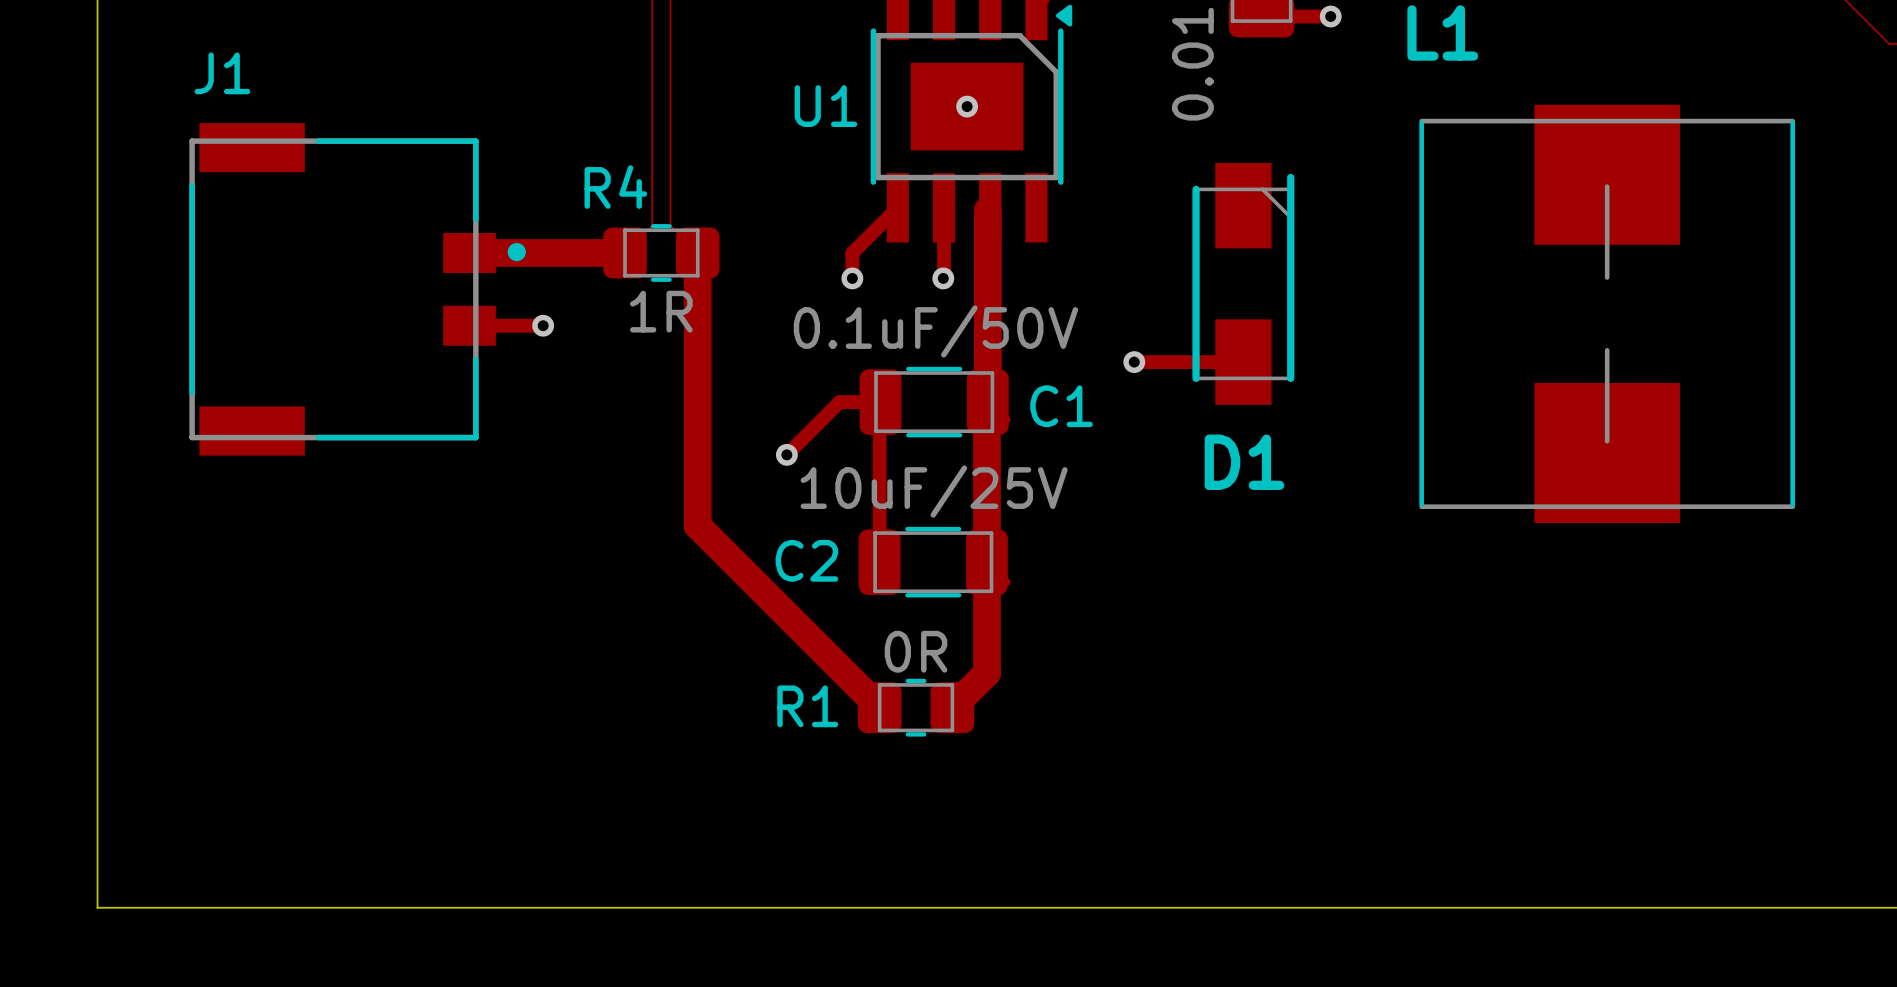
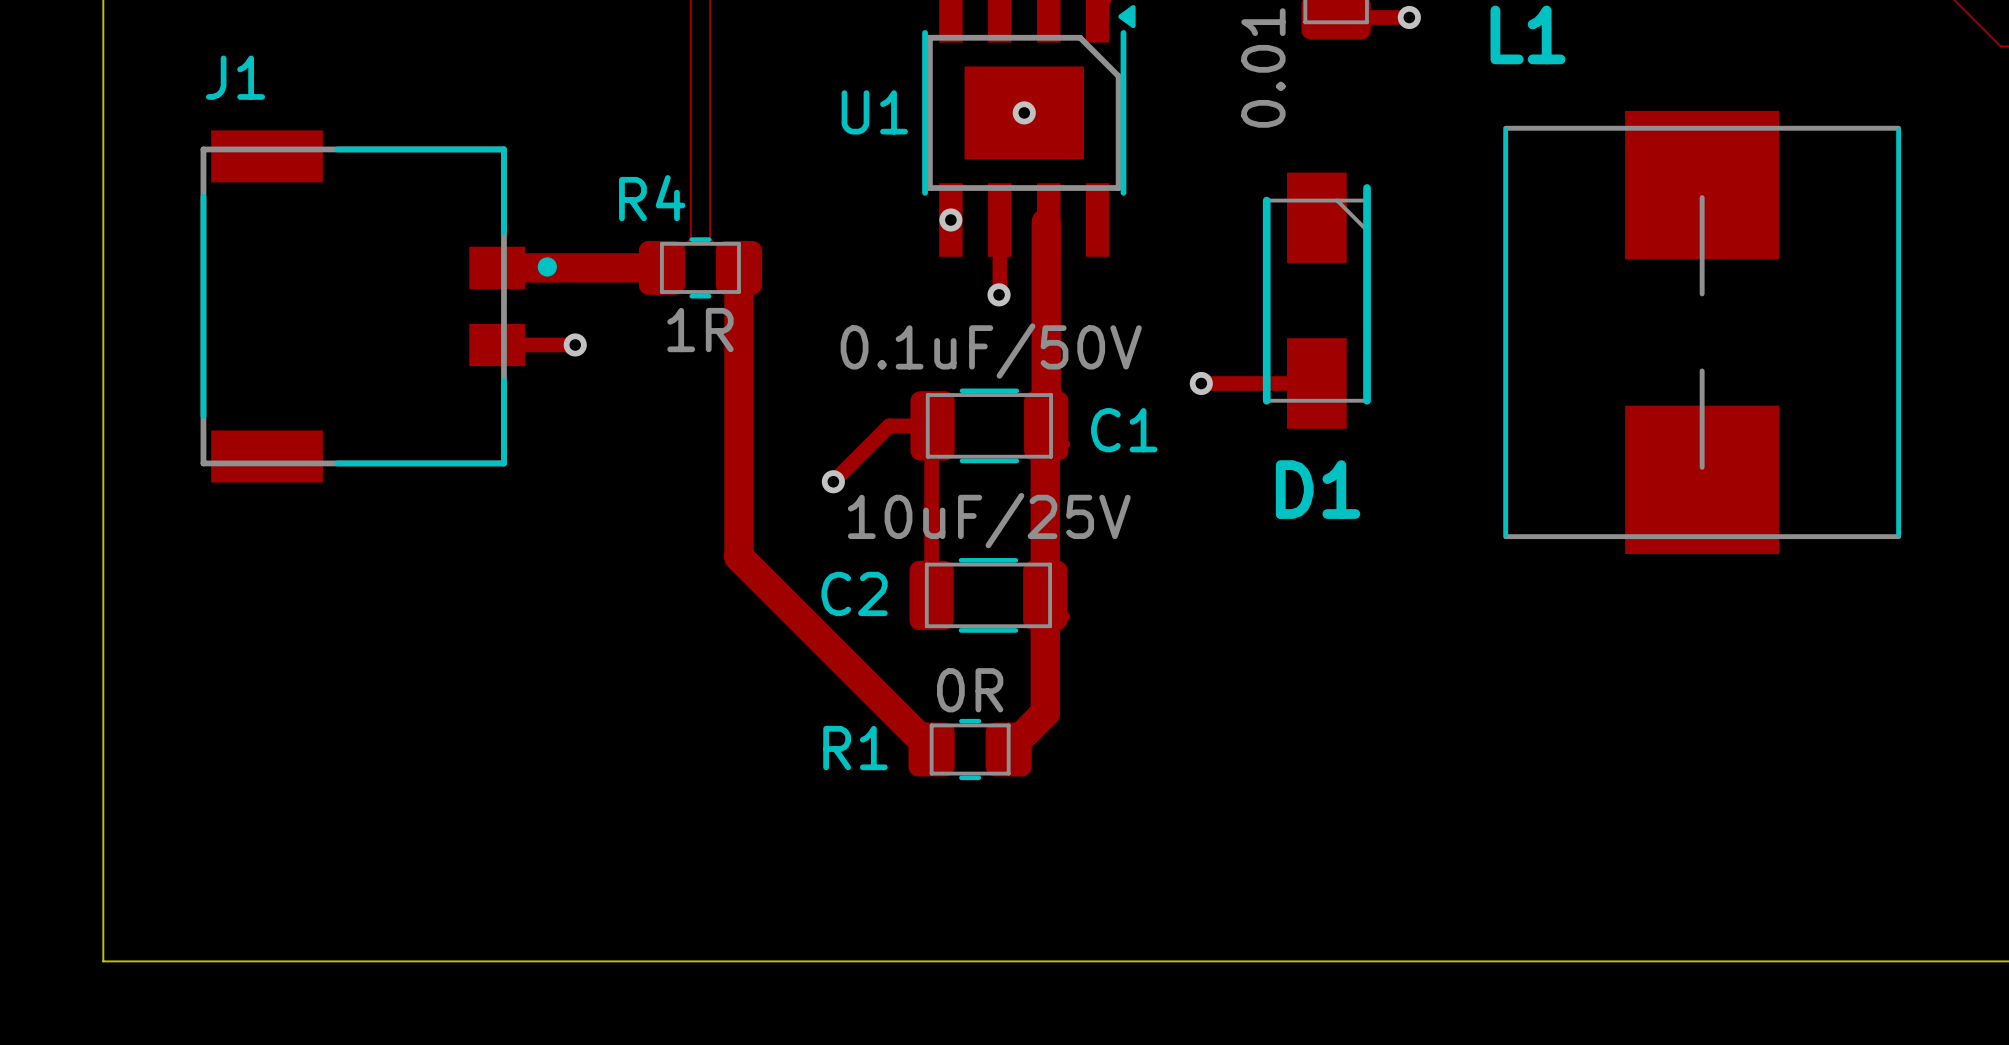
track: (897, 207) (852, 253) (852, 278) -> none
via position: (852, 278) -> (950, 220)

